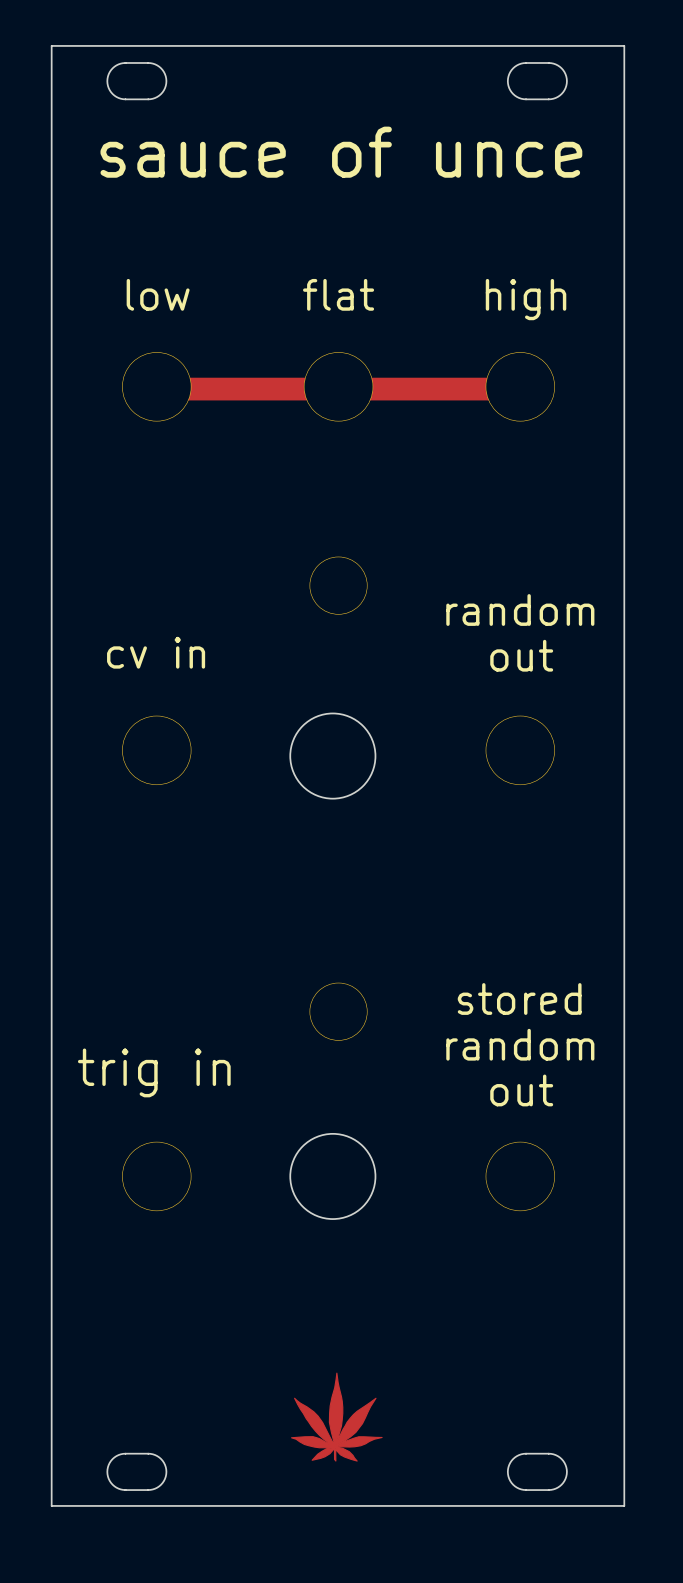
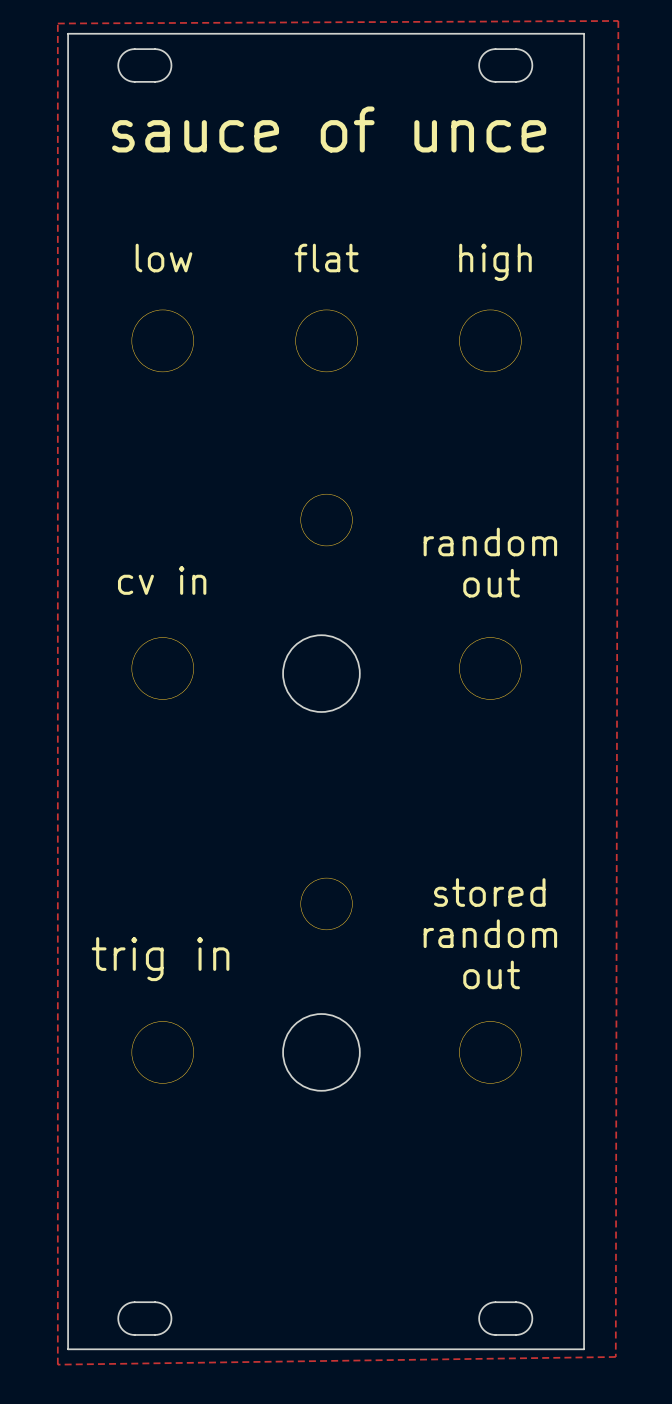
zone outline: none -> (618, 20) (57, 23) (57, 1364) (615, 1356) (618, 20)
track: (173, 389) (514, 389) -> none
drawing: [290, 1372, 383, 1462] -> none

